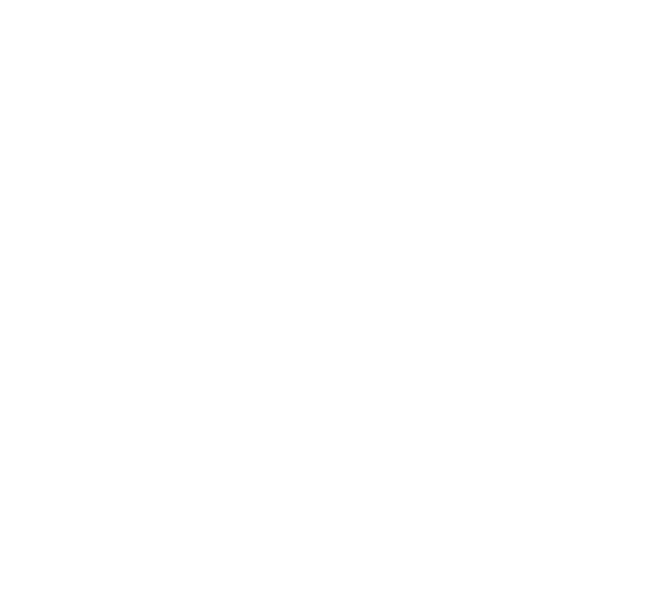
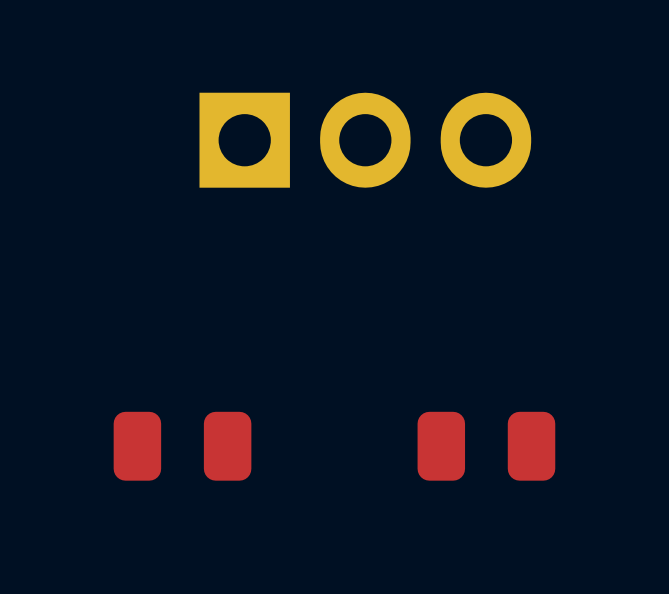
part: none -> (365, 140)
part: none -> (182, 446)
part: none -> (486, 446)

